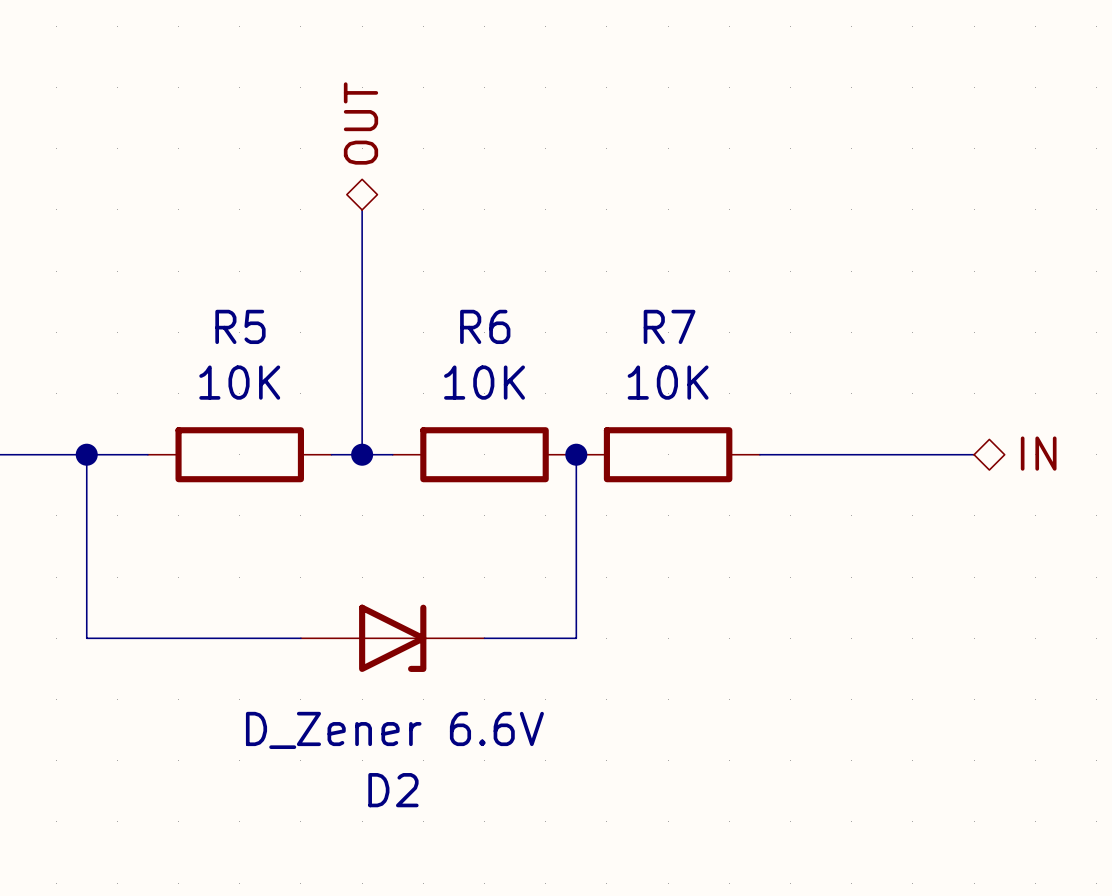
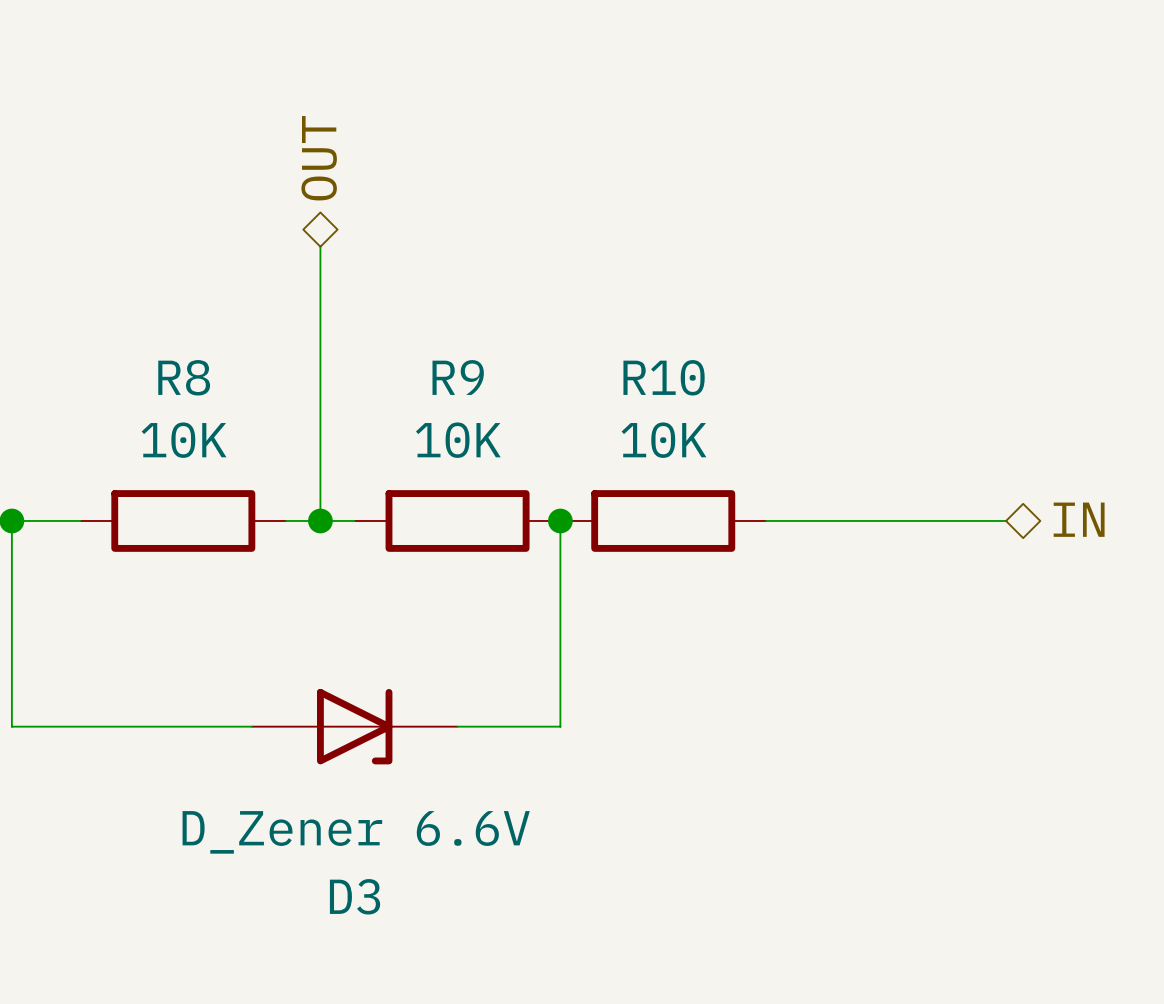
R5 name: R5 (240, 326) -> R8 (184, 377)
R6 name: R6 (485, 326) -> R9 (458, 377)
R7 name: R7 (669, 326) -> R10 (664, 377)
D2 name: D2 (393, 790) -> D3 (355, 896)

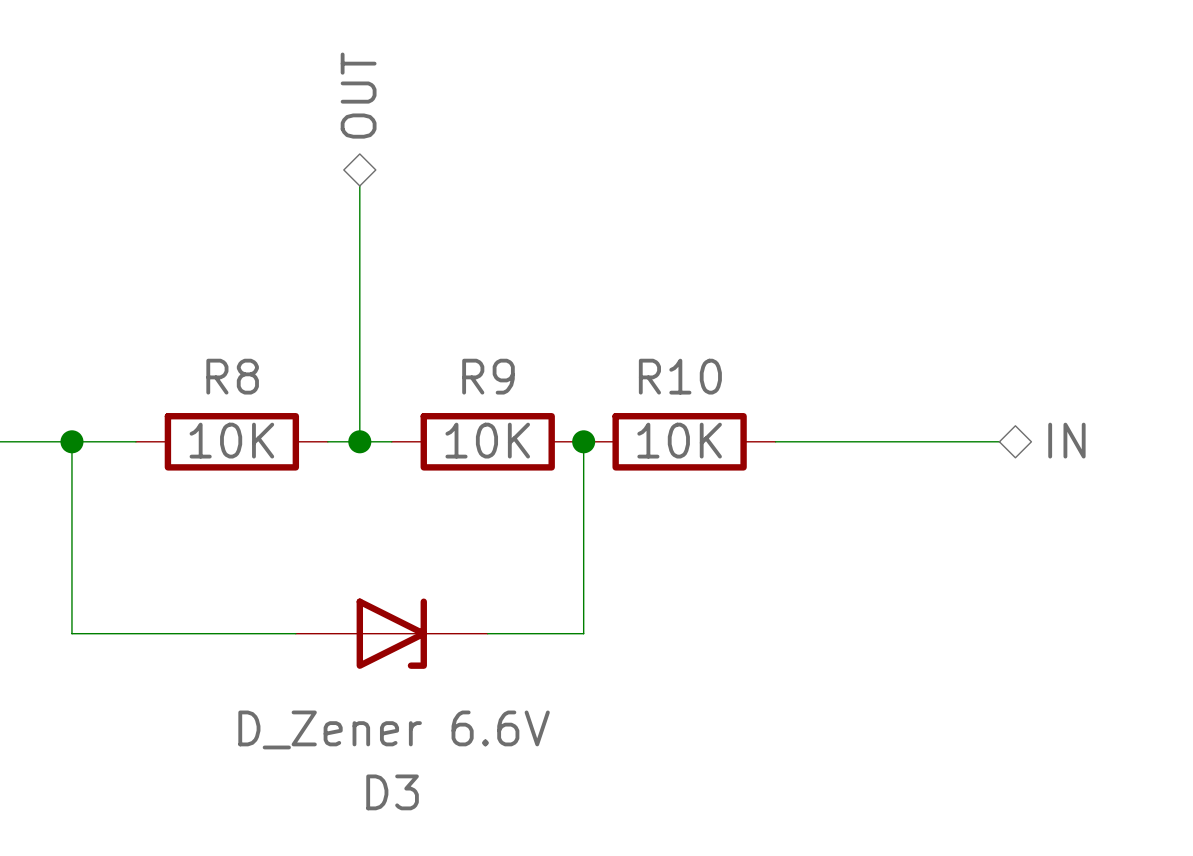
R8 name position: R8 (184, 377) -> R8 (232, 376)
R9 name position: R9 (458, 377) -> R9 (488, 376)
R10 name position: R10 (664, 377) -> R10 (680, 376)
R8 value position: 10K (184, 440) -> 10K (231, 440)
R9 value position: 10K (458, 440) -> 10K (487, 440)
R10 value position: 10K (663, 440) -> 10K (679, 440)

